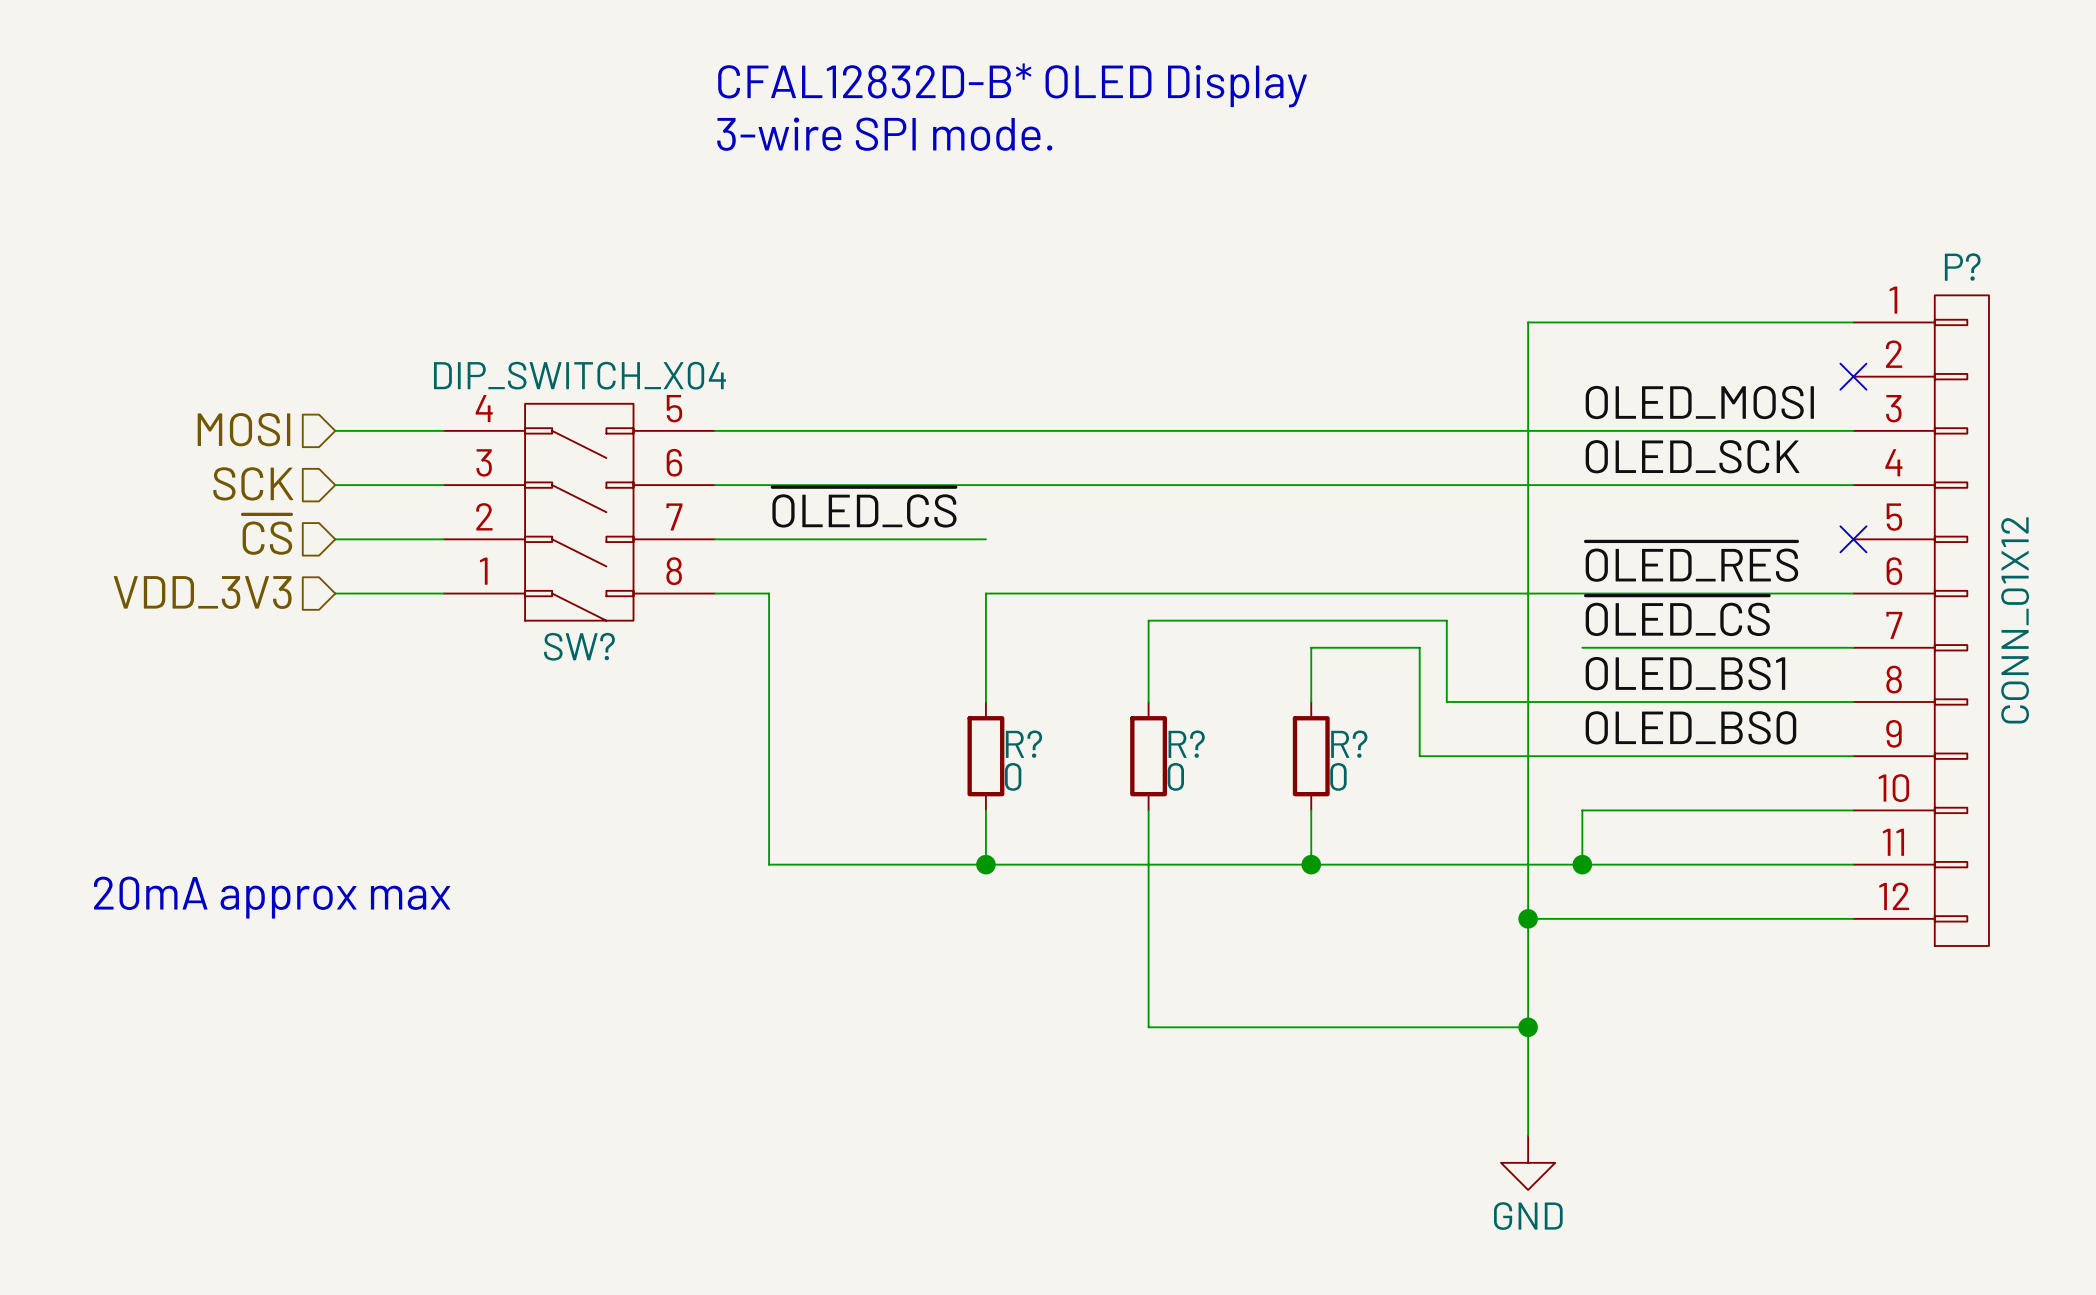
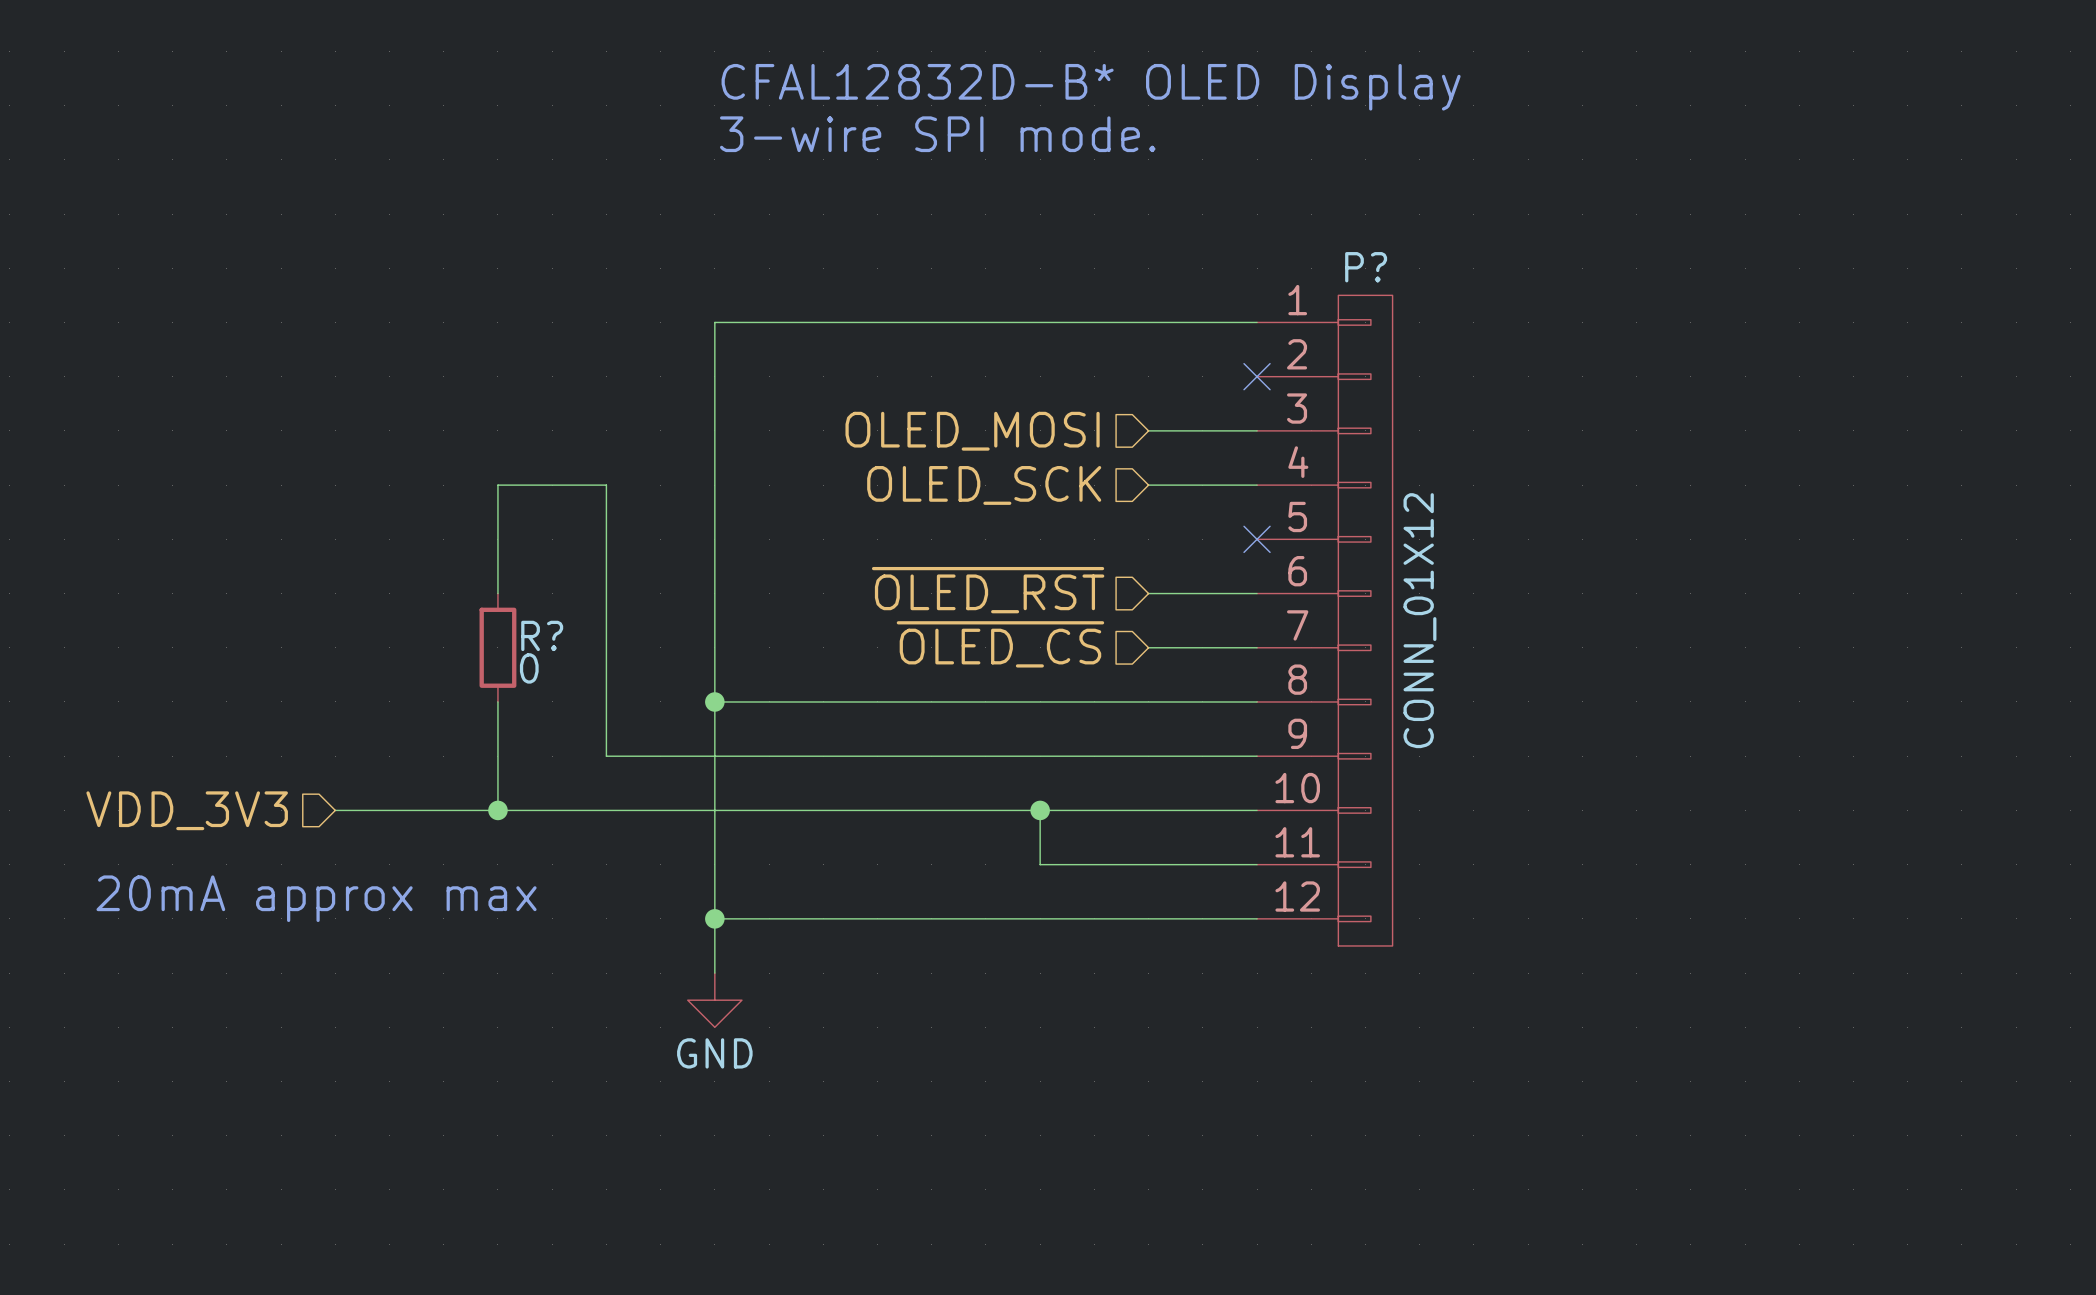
wire: none -> (1257, 322) (714, 322) (714, 973)
wire: (1853, 322) (1528, 322) (1528, 1135) -> none
no-connect mark: none -> (1257, 376)
no-connect mark: (1853, 376) -> none
label: OLED_MOSI (1699, 402) -> none
hierarchical label: MOSI (243, 429) -> none
hierarchical label: none -> OLED_MOSI (972, 431)
wire: (335, 430) (443, 430) -> none
wire: (714, 430) (1148, 430) -> none
wire: (1257, 430) (1853, 430) -> none
label: OLED_SCK (1692, 456) -> none
hierarchical label: SCK (253, 483) -> none
hierarchical label: none -> OLED_SCK (984, 485)
wire: (335, 485) (443, 485) -> none
wire: (714, 485) (1148, 485) -> none
wire: (1257, 485) (1853, 485) -> none
label: ~{OLED_CS} (864, 507) -> none
SW?: DIP_SWITCH_X04 (579, 512) -> none
hierarchical label: ~{CS} (267, 534) -> none
wire: (335, 539) (443, 539) -> none
wire: (714, 539) (985, 539) -> none
no-connect mark: none -> (1257, 539)
no-connect mark: (1853, 539) -> none
label: ~{OLED_RES} (1691, 561) -> none
hierarchical label: none -> ~{OLED_RST} (988, 590)
hierarchical label position: VDD_3V3 (202, 592) -> VDD_3V3 (187, 810)
wire: (335, 593) (443, 593) -> none
wire: none -> (497, 593) (497, 485) (606, 485) (606, 756) (1257, 756)
wire: (714, 593) (769, 593) (769, 864) (1040, 864) -> (1040, 810) (1040, 864)
wire: (1148, 593) (985, 593) (985, 701) -> none
wire: (1257, 593) (1853, 593) -> none
label: ~{OLED_CS} (1677, 615) -> none
P?: none -> CONN_01X12 (1324, 620)
P?: CONN_01X12 (1921, 620) -> none
hierarchical label: none -> ~{OLED_CS} (1000, 644)
R?: none -> 0 (497, 647)
wire: none -> (1148, 647) (1257, 647)
wire: (1582, 647) (1853, 647) -> none
label: OLED_BS1 (1685, 673) -> none
wire: none -> (497, 701) (497, 810)
wire: none -> (714, 701) (1257, 701)
junction: none -> (714, 701)
wire: (1148, 701) (1148, 620) (1446, 620) (1446, 701) (1853, 701) -> none
wire: (1311, 701) (1311, 647) (1419, 647) (1419, 756) (1853, 756) -> none
label: OLED_BS0 (1690, 727) -> none
R?: 0 (985, 756) -> none
R?: 0 (1148, 756) -> none
R?: 0 (1311, 756) -> none
wire: none -> (335, 810) (1257, 810)
junction: none -> (497, 810)
wire: (985, 810) (985, 864) -> none
wire: (1148, 810) (1148, 1027) (1528, 1027) -> none
wire: (1311, 810) (1311, 864) -> none
wire: (1853, 810) (1582, 810) (1582, 864) -> none
junction position: (985, 864) -> (1040, 810)
wire: (1257, 864) (1853, 864) -> none
junction: (1311, 864) -> none
junction: (1582, 864) -> none
wire: none -> (714, 918) (1257, 918)
junction: none -> (714, 918)
wire: (1528, 918) (1853, 918) -> none
junction: (1528, 918) -> none
power symbol: none -> GND (714, 1000)
junction: (1528, 1027) -> none
power symbol: GND (1528, 1162) -> none

